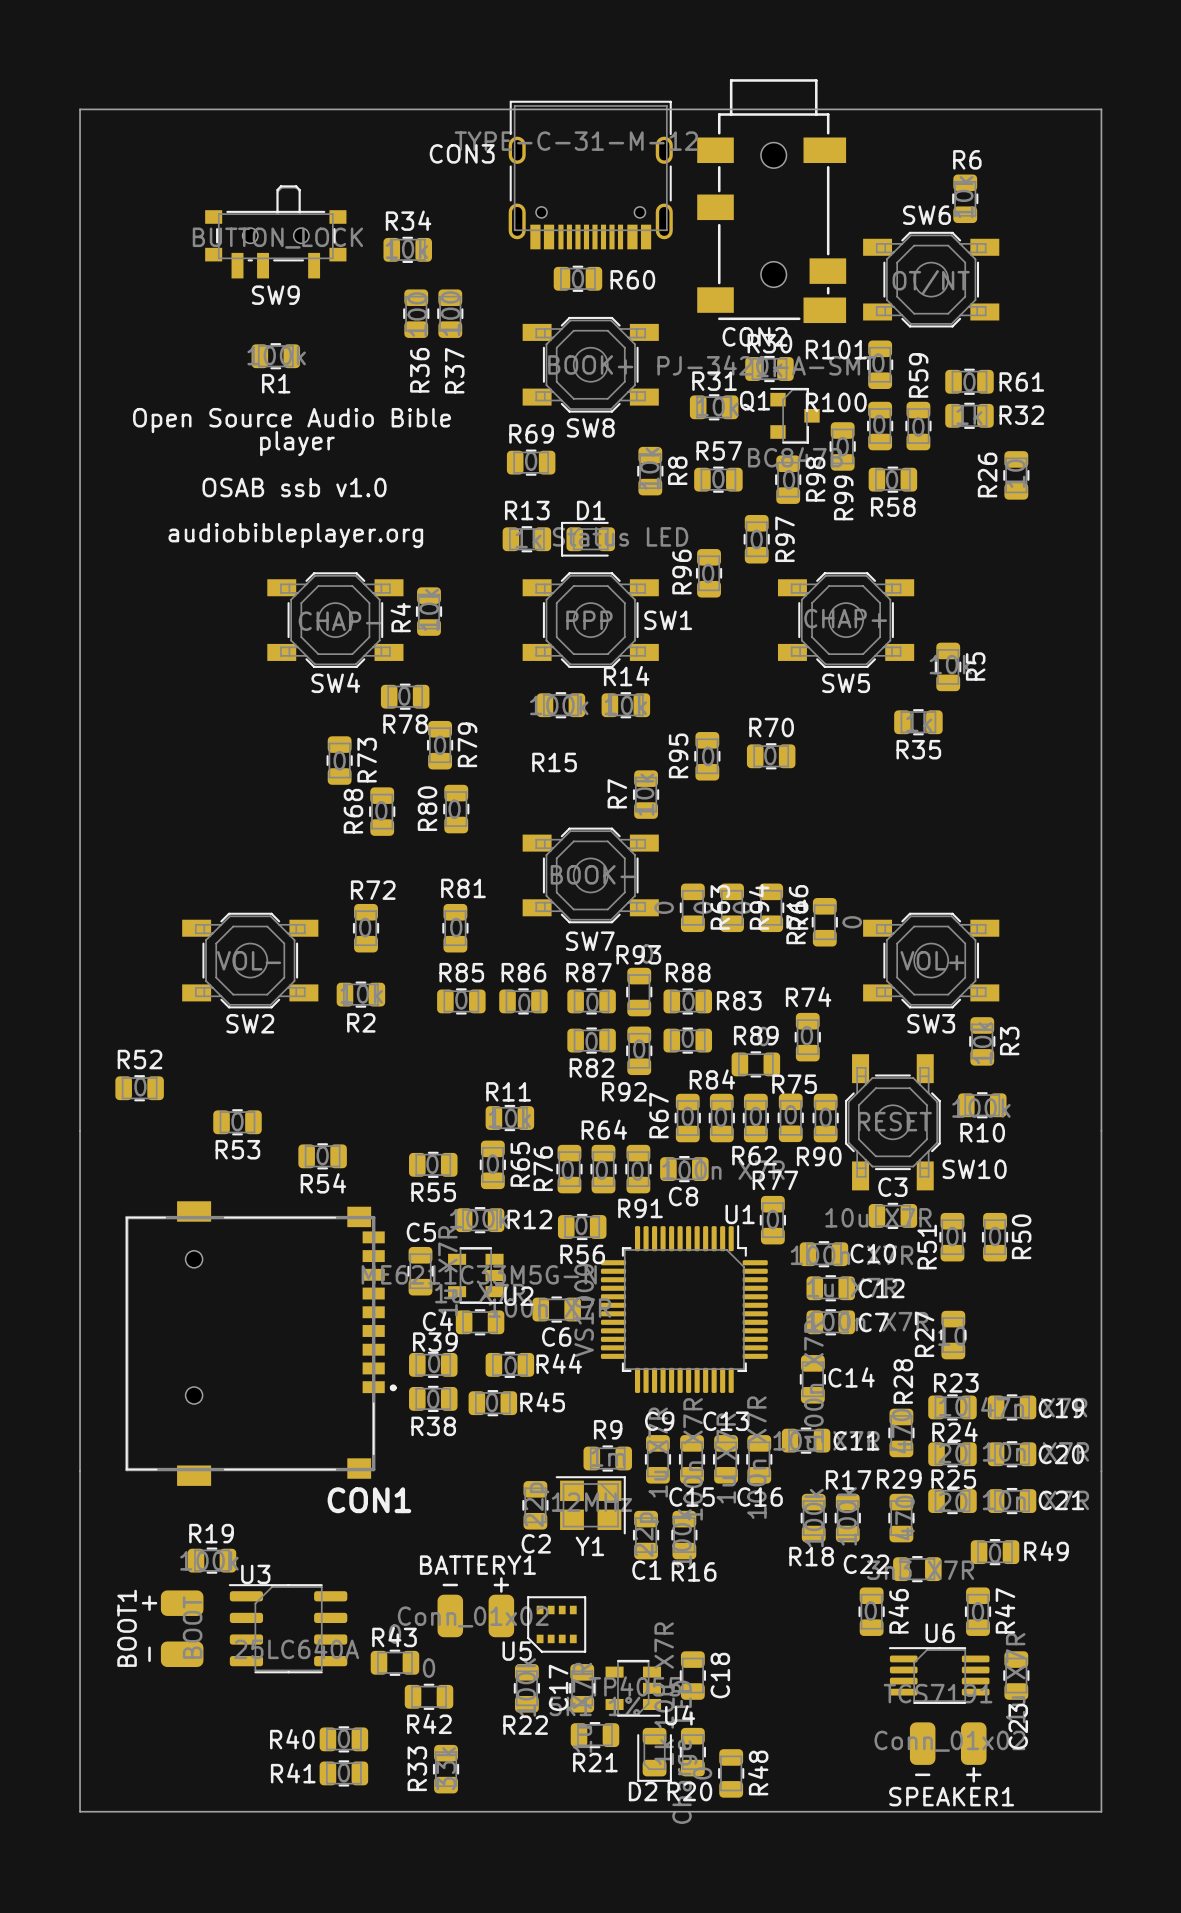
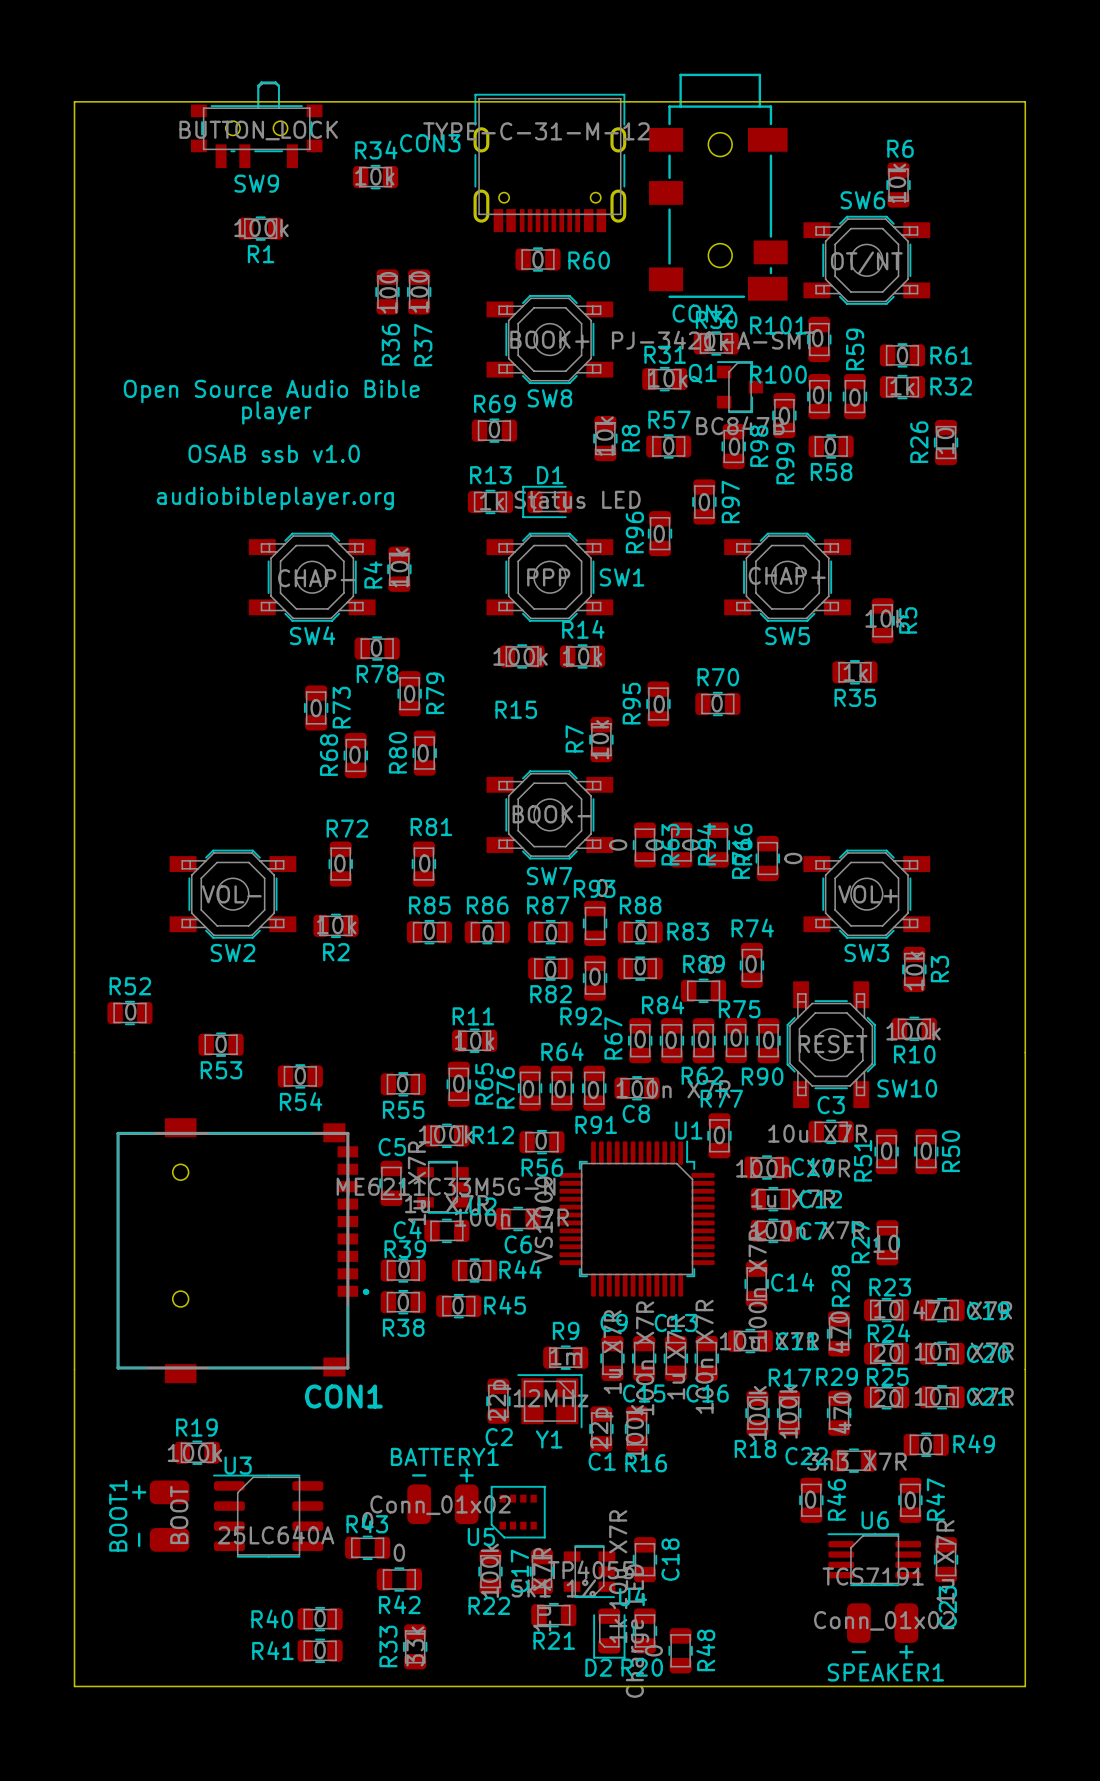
SW9 position: (275, 231) -> (256, 124)
R34 position: (407, 249) -> (375, 177)
R1 position: (275, 356) -> (260, 228)

